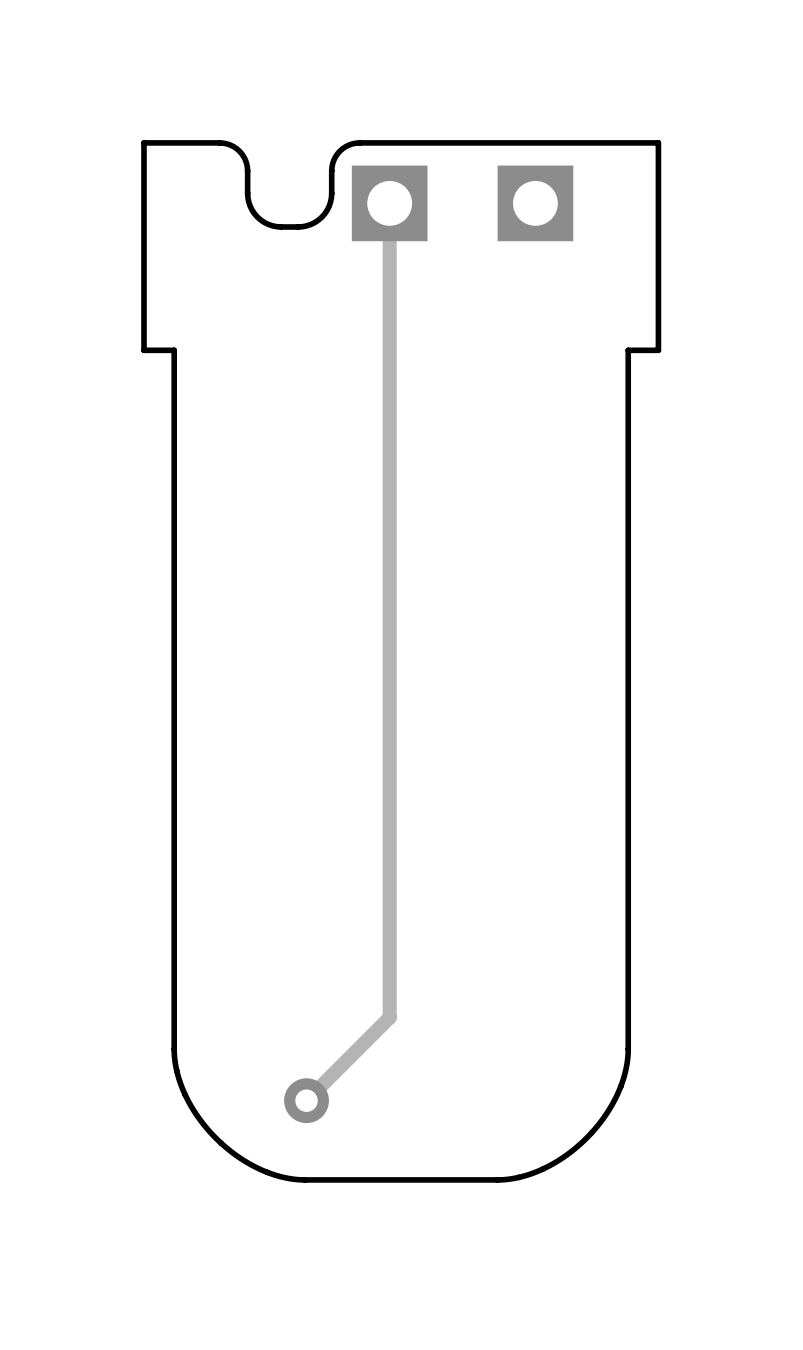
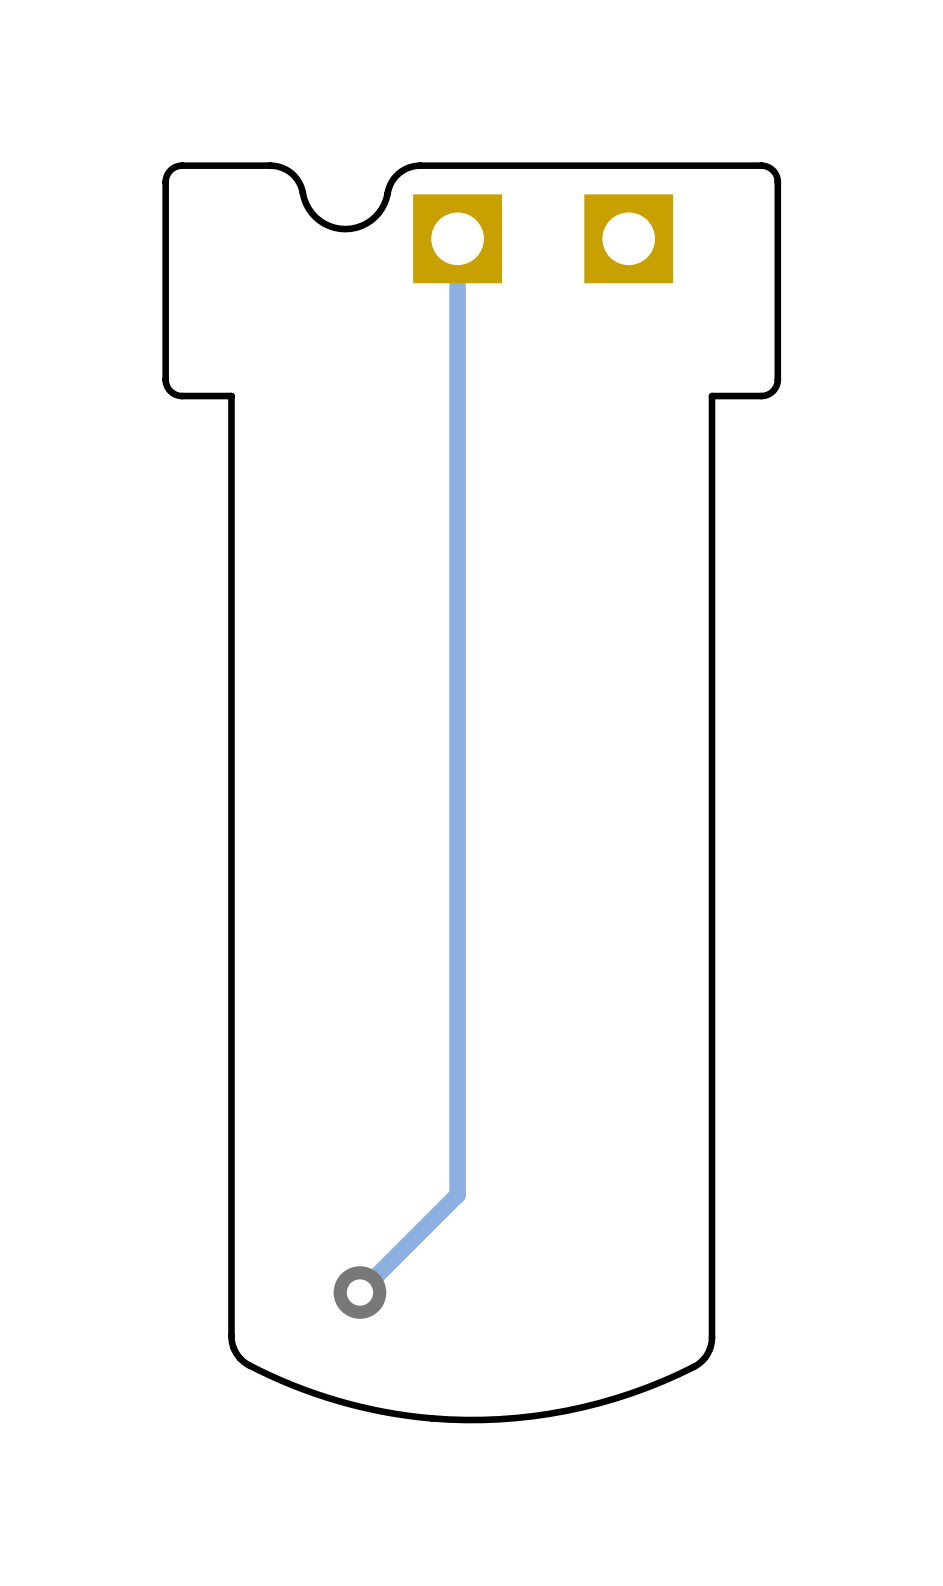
board edge: (658, 142) (352, 143) (339, 151) (333, 160) (331, 197) (327, 210) (314, 222) (298, 226) (272, 225) (260, 220) (254, 213) (247, 197) (246, 163) (241, 153) (233, 146) (219, 142) (144, 142) (144, 350) (174, 350) (174, 1059) (184, 1093) (205, 1126) (234, 1154) (267, 1172) (284, 1177) (302, 1179) (498, 1179) (520, 1177) (552, 1163) (580, 1143) (604, 1116) (620, 1086) (626, 1067) (628, 1049) (628, 350) (658, 350) (658, 142) -> (761, 165) (772, 170) (777, 180) (777, 383) (772, 391) (765, 395) (711, 396) (711, 1337) (709, 1348) (704, 1358) (695, 1366) (631, 1393) (566, 1410) (516, 1418) (465, 1420) (408, 1415) (361, 1407) (303, 1389) (245, 1363) (236, 1353) (231, 1340) (231, 396) (180, 395) (171, 392) (166, 385) (166, 176) (171, 169) (180, 165) (278, 166) (288, 171) (296, 179) (306, 203) (315, 217) (329, 225) (345, 229) (361, 225) (375, 217) (384, 203) (393, 179) (401, 171) (416, 165) (761, 165)

